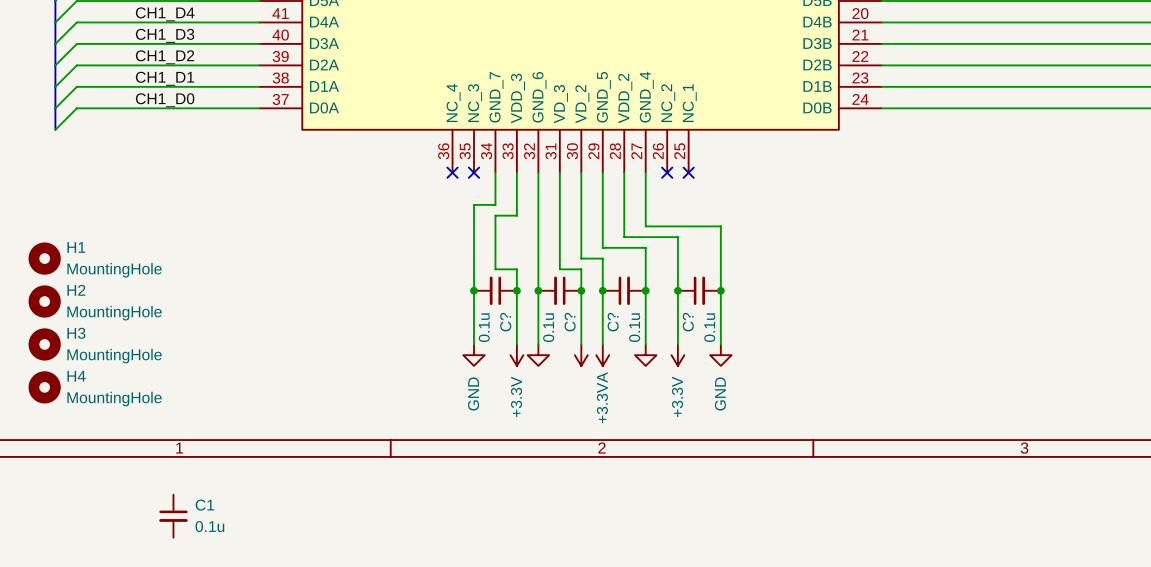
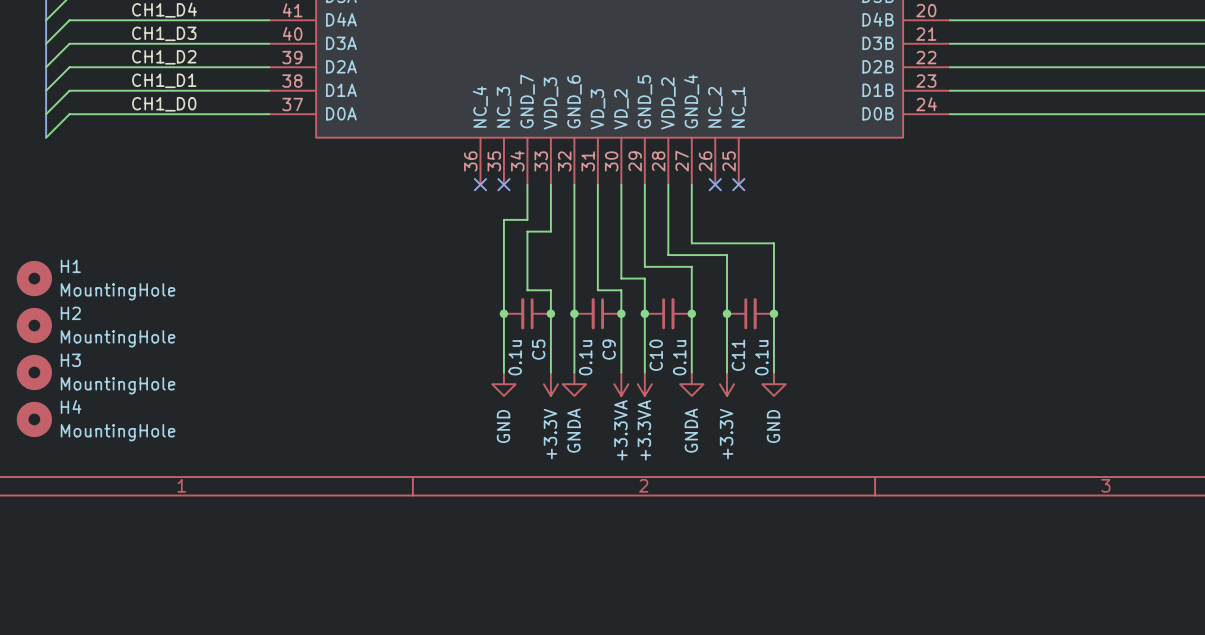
C? name: C? (505, 322) -> C5 (538, 349)
C? name: C? (570, 322) -> C9 (609, 349)
C? name: C? (613, 322) -> C10 (656, 355)
C? name: C? (688, 322) -> C11 (738, 355)
power symbol text: none -> GNDA (573, 430)
power symbol text: none -> +3.3VA (620, 430)
power symbol text: none -> GNDA (691, 430)
C1: 0.1u (173, 516) -> none

